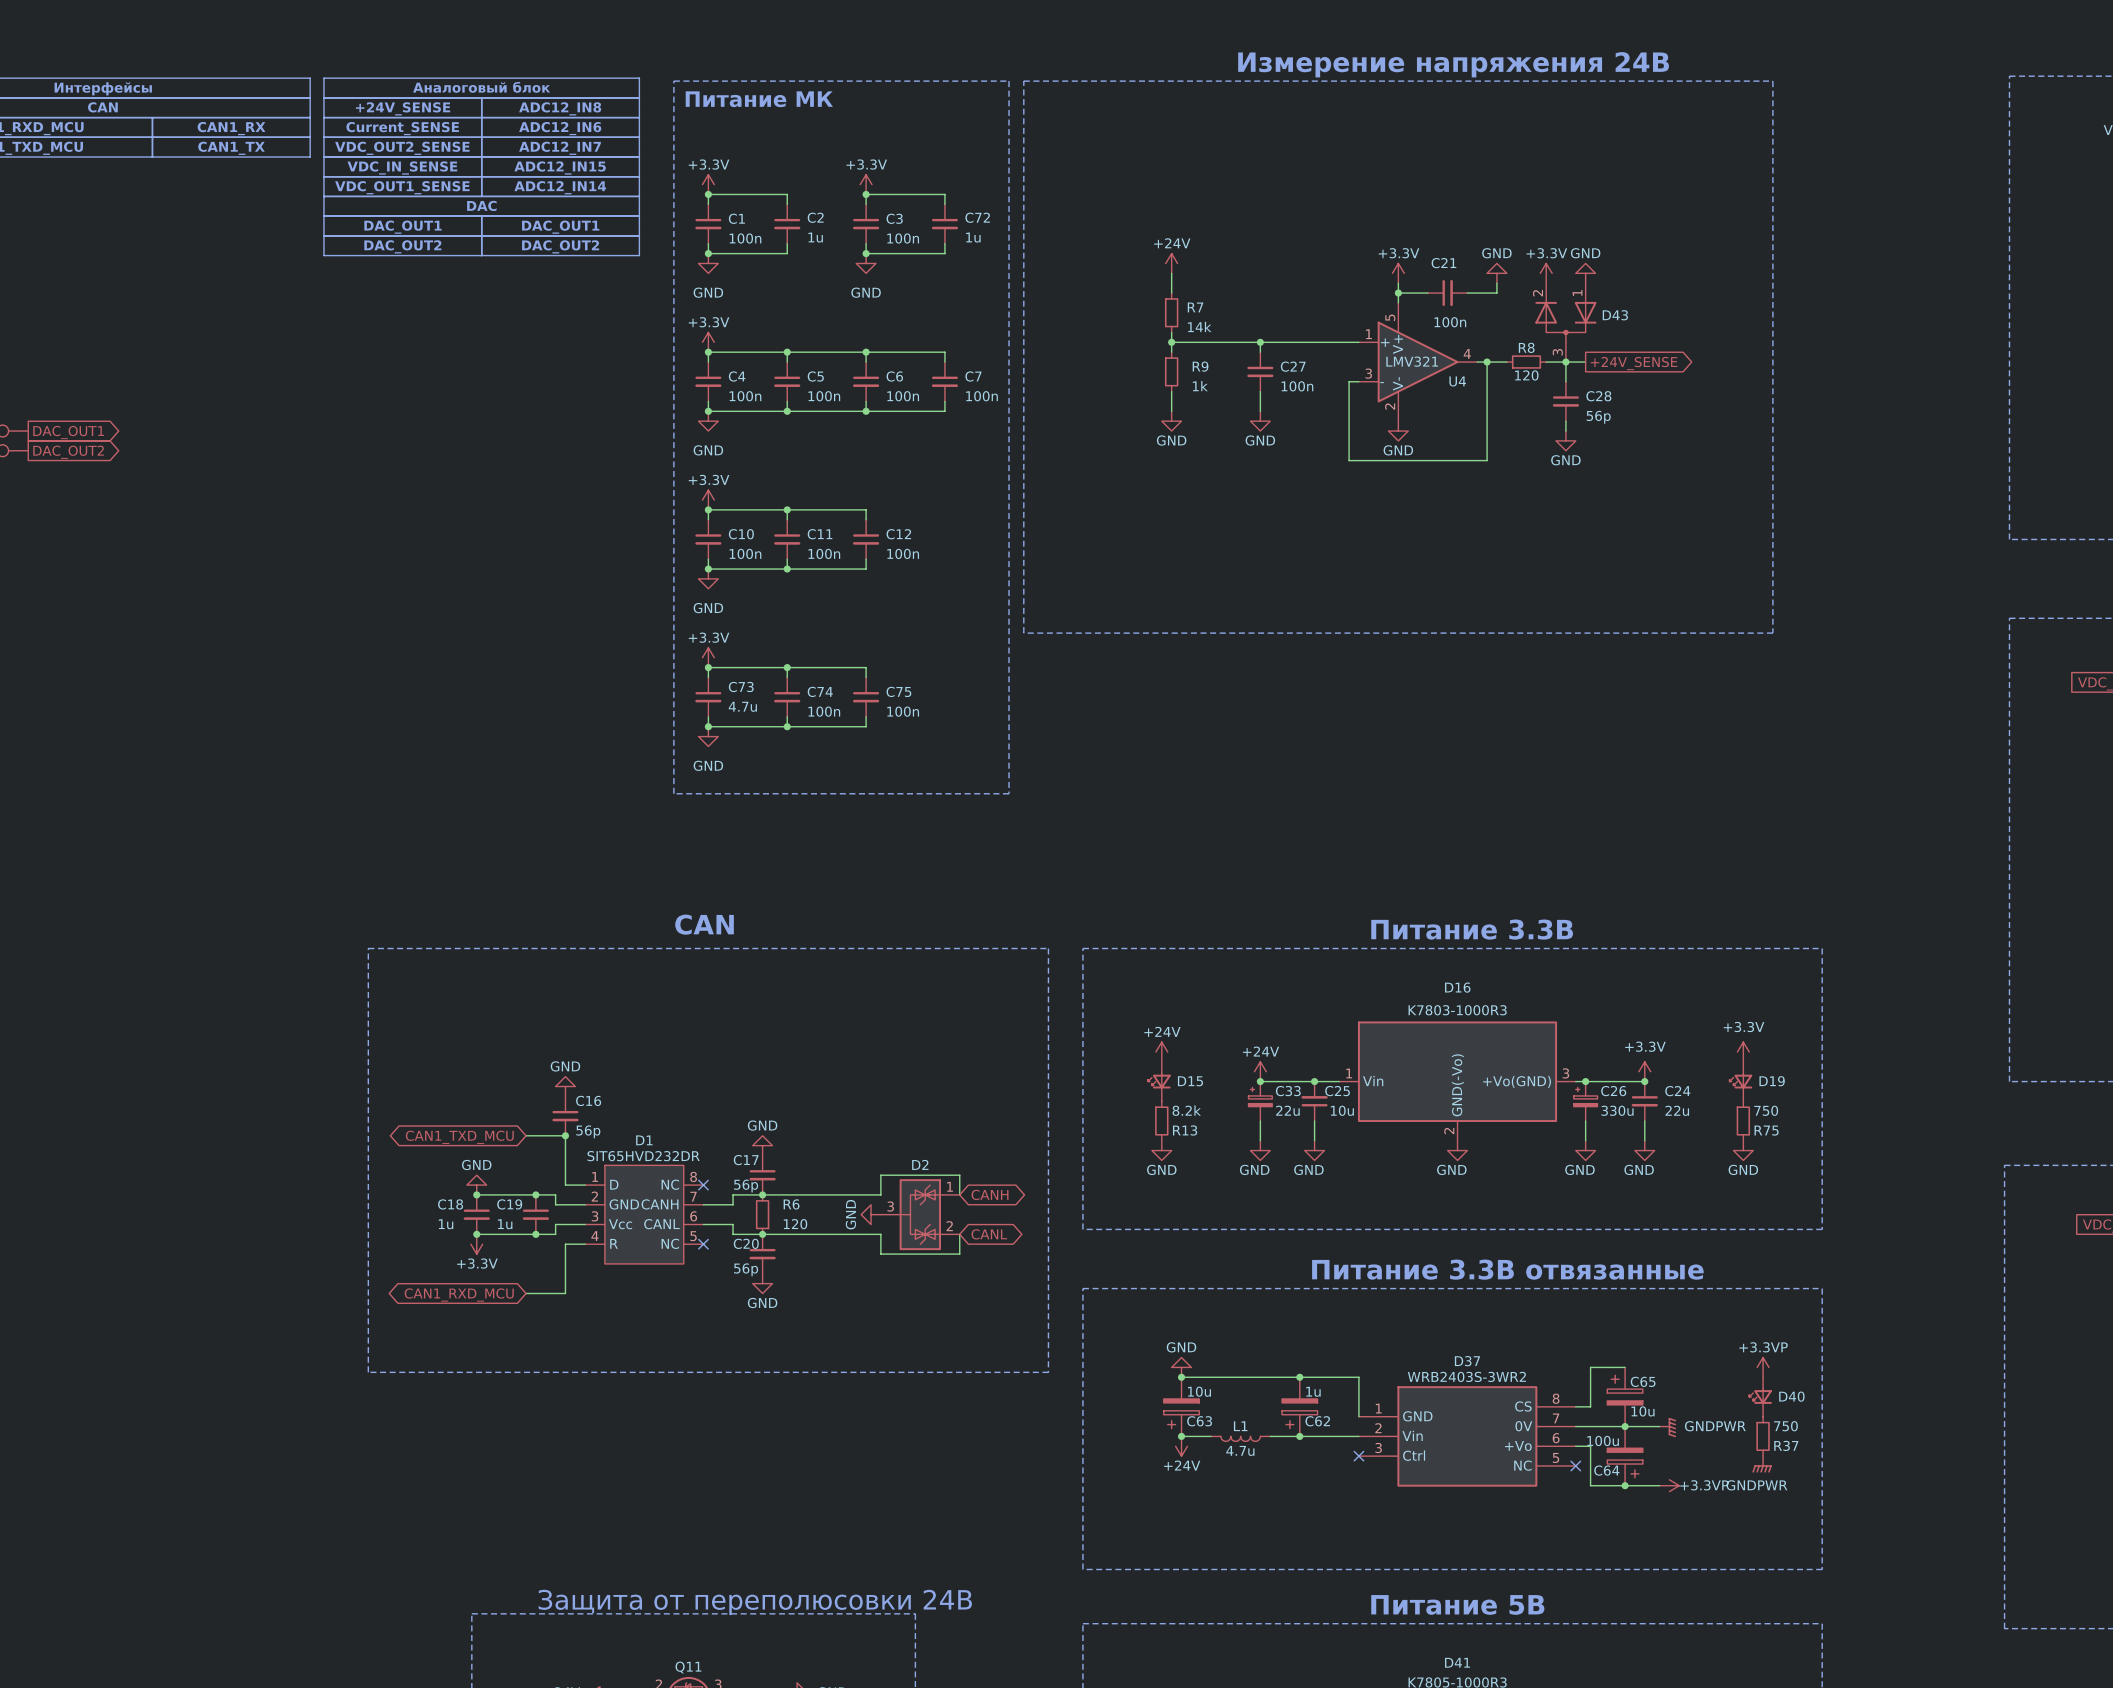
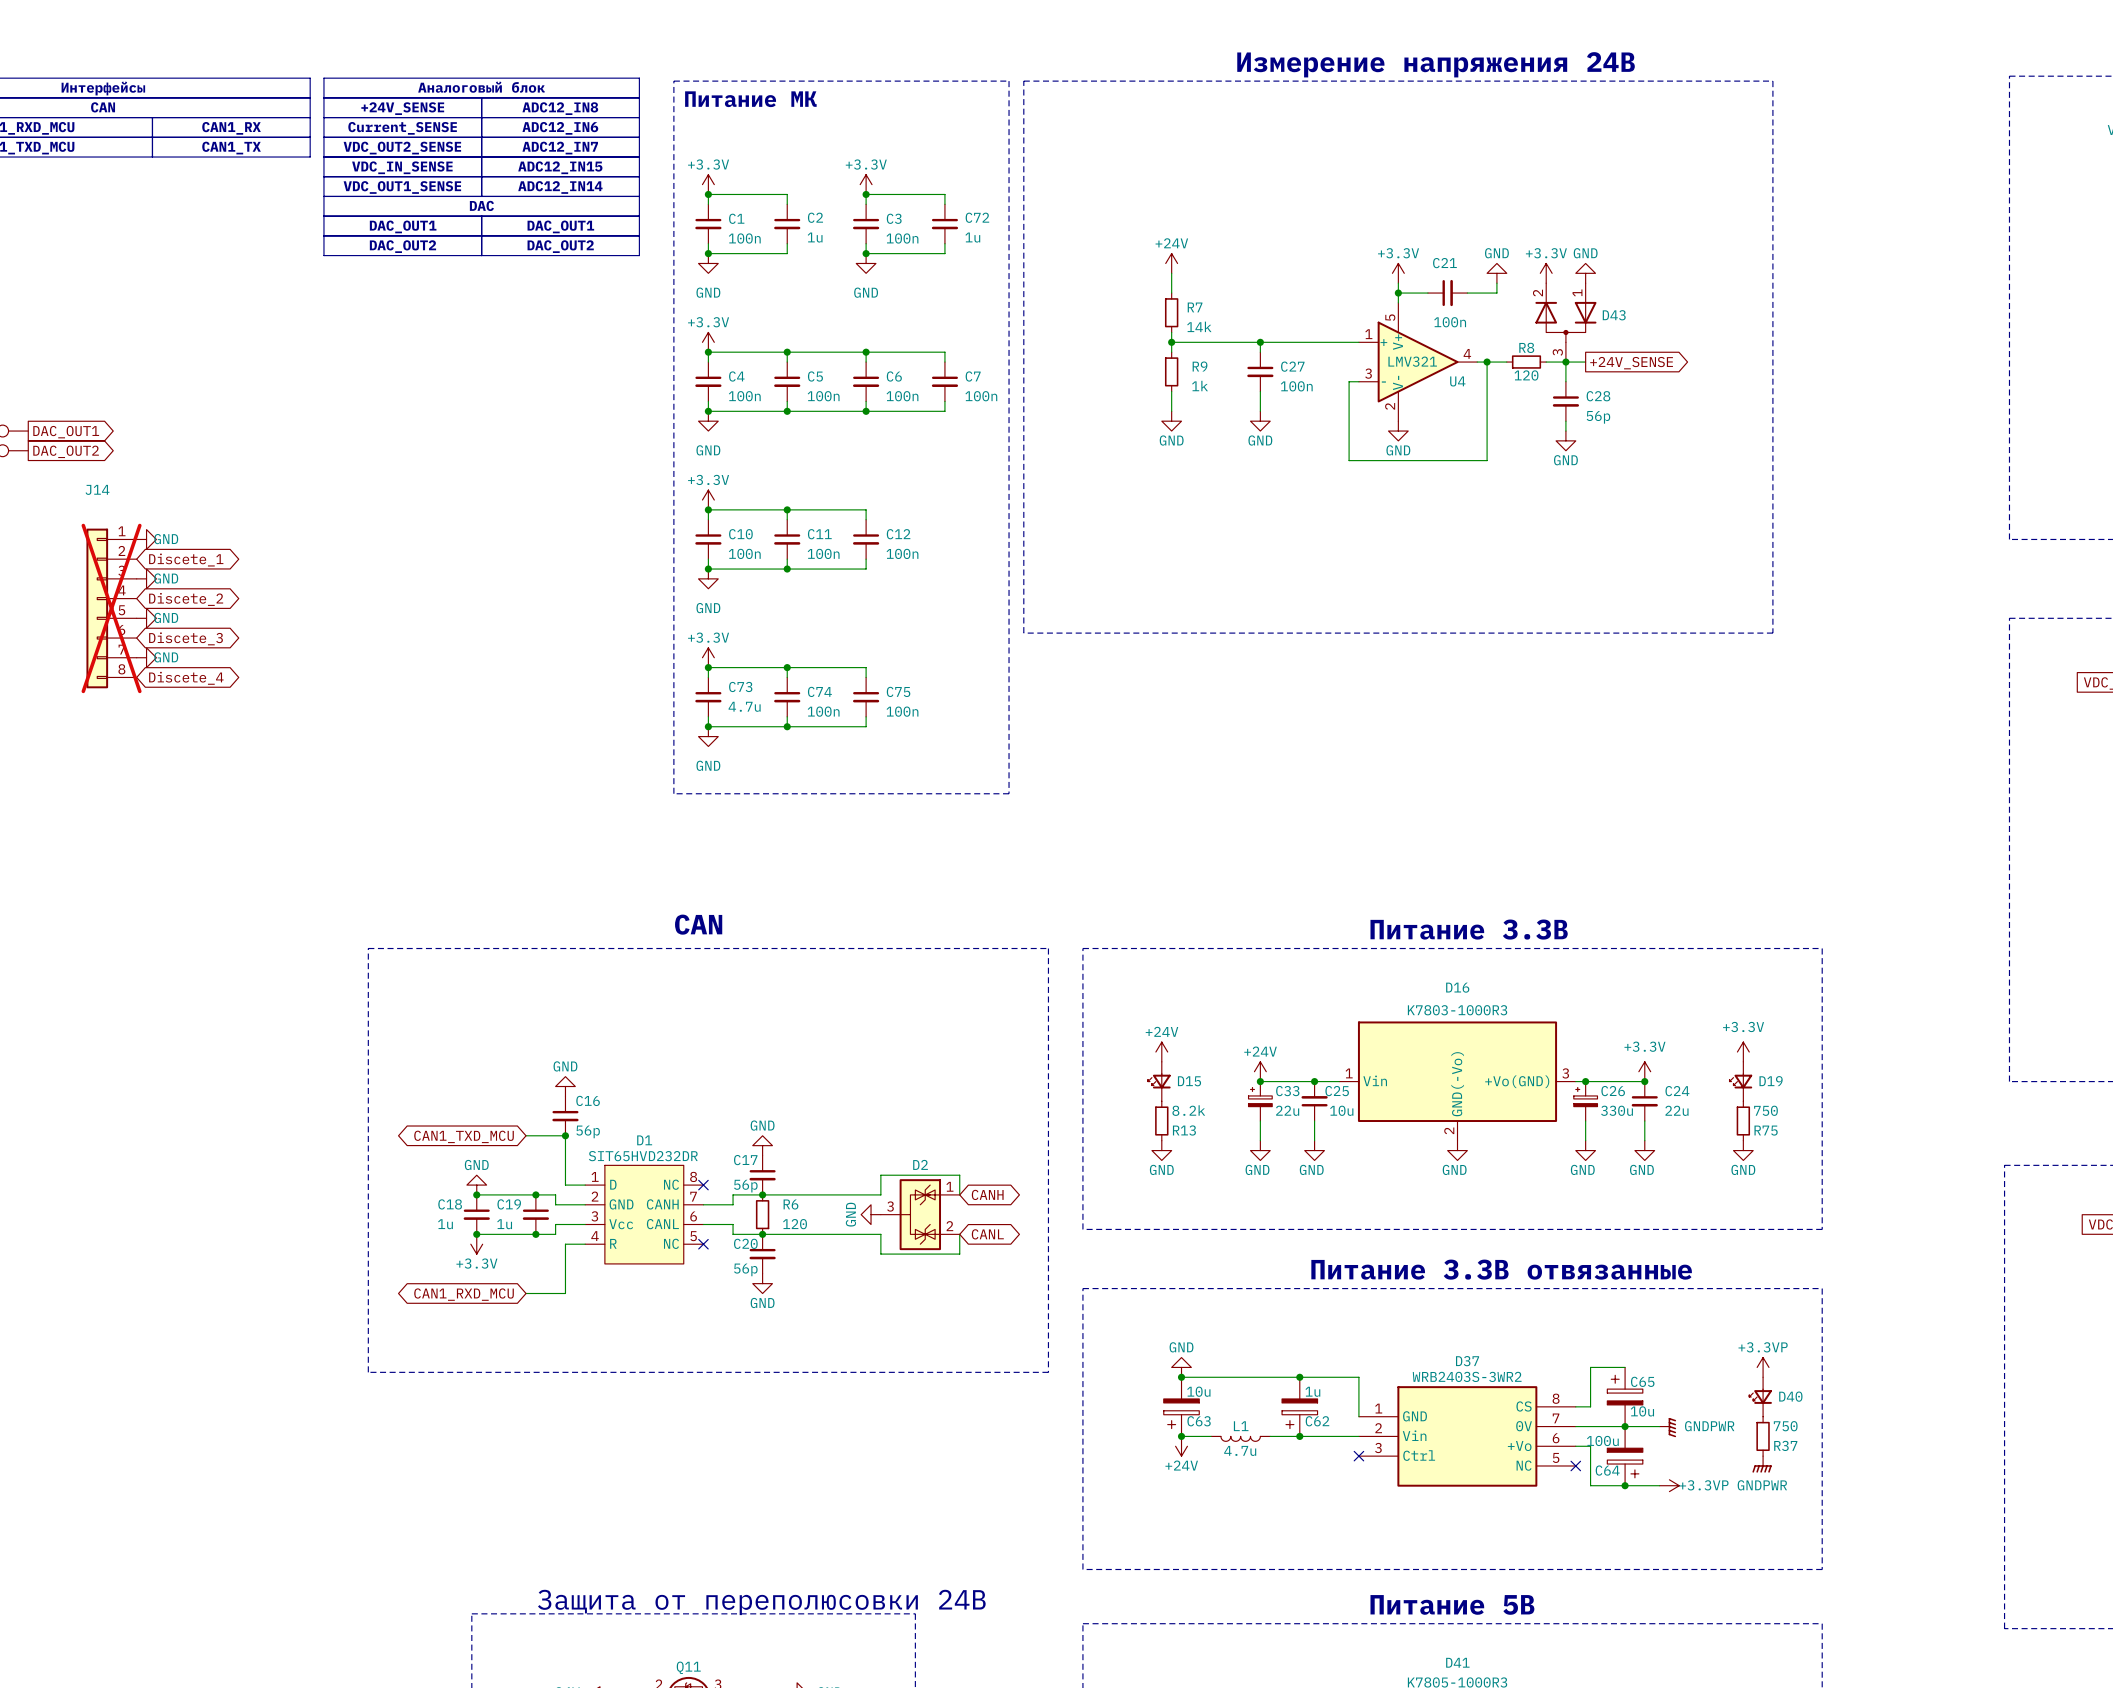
power symbol: none -> GND (146, 539)
global label: none -> Discete_1 (186, 560)
power symbol: none -> GND (146, 578)
global label: none -> Discete_2 (186, 599)
J14: none -> (111, 608)
power symbol: none -> GND (146, 618)
global label: none -> Discete_3 (186, 638)
power symbol: none -> GND (146, 657)
global label: none -> Discete_4 (186, 678)

